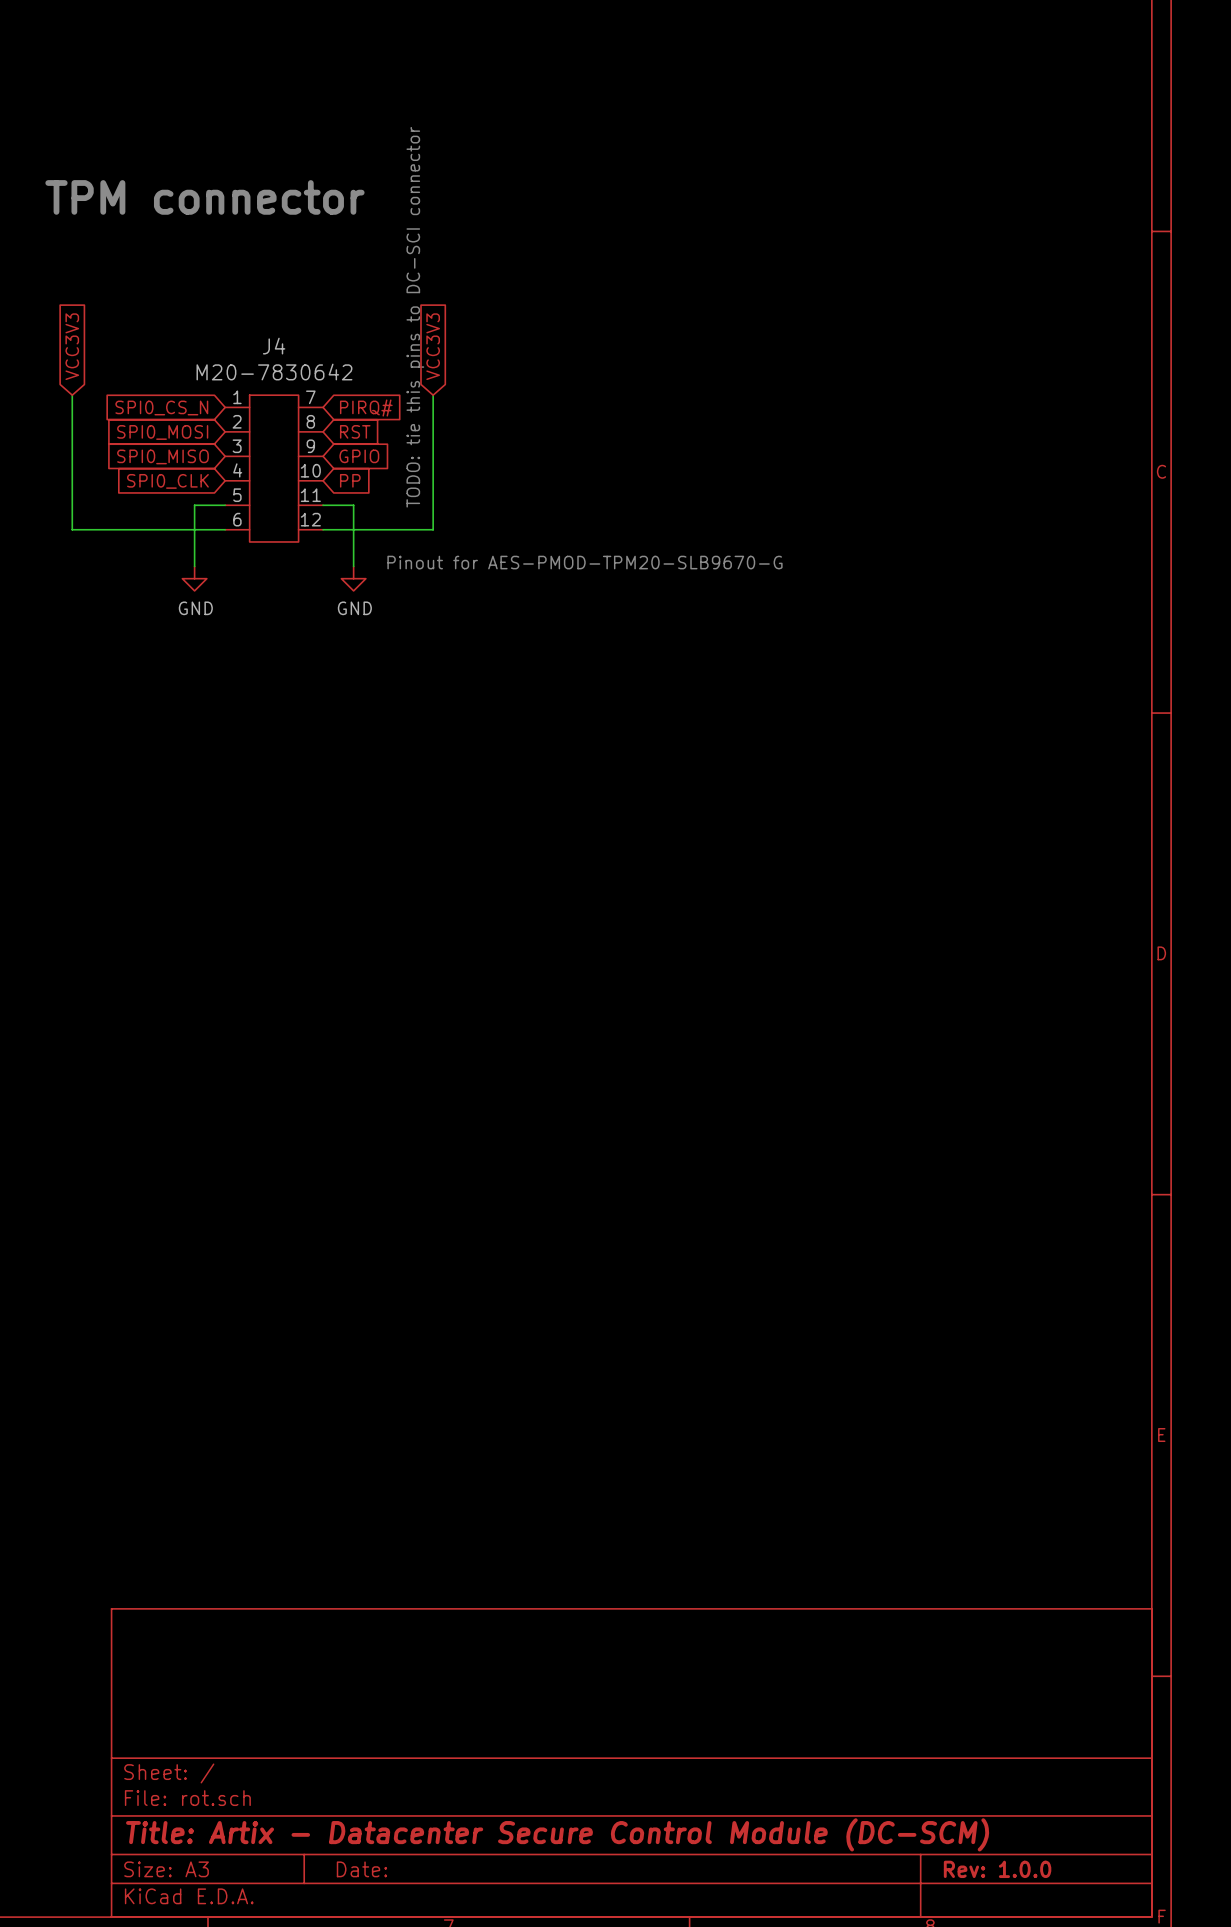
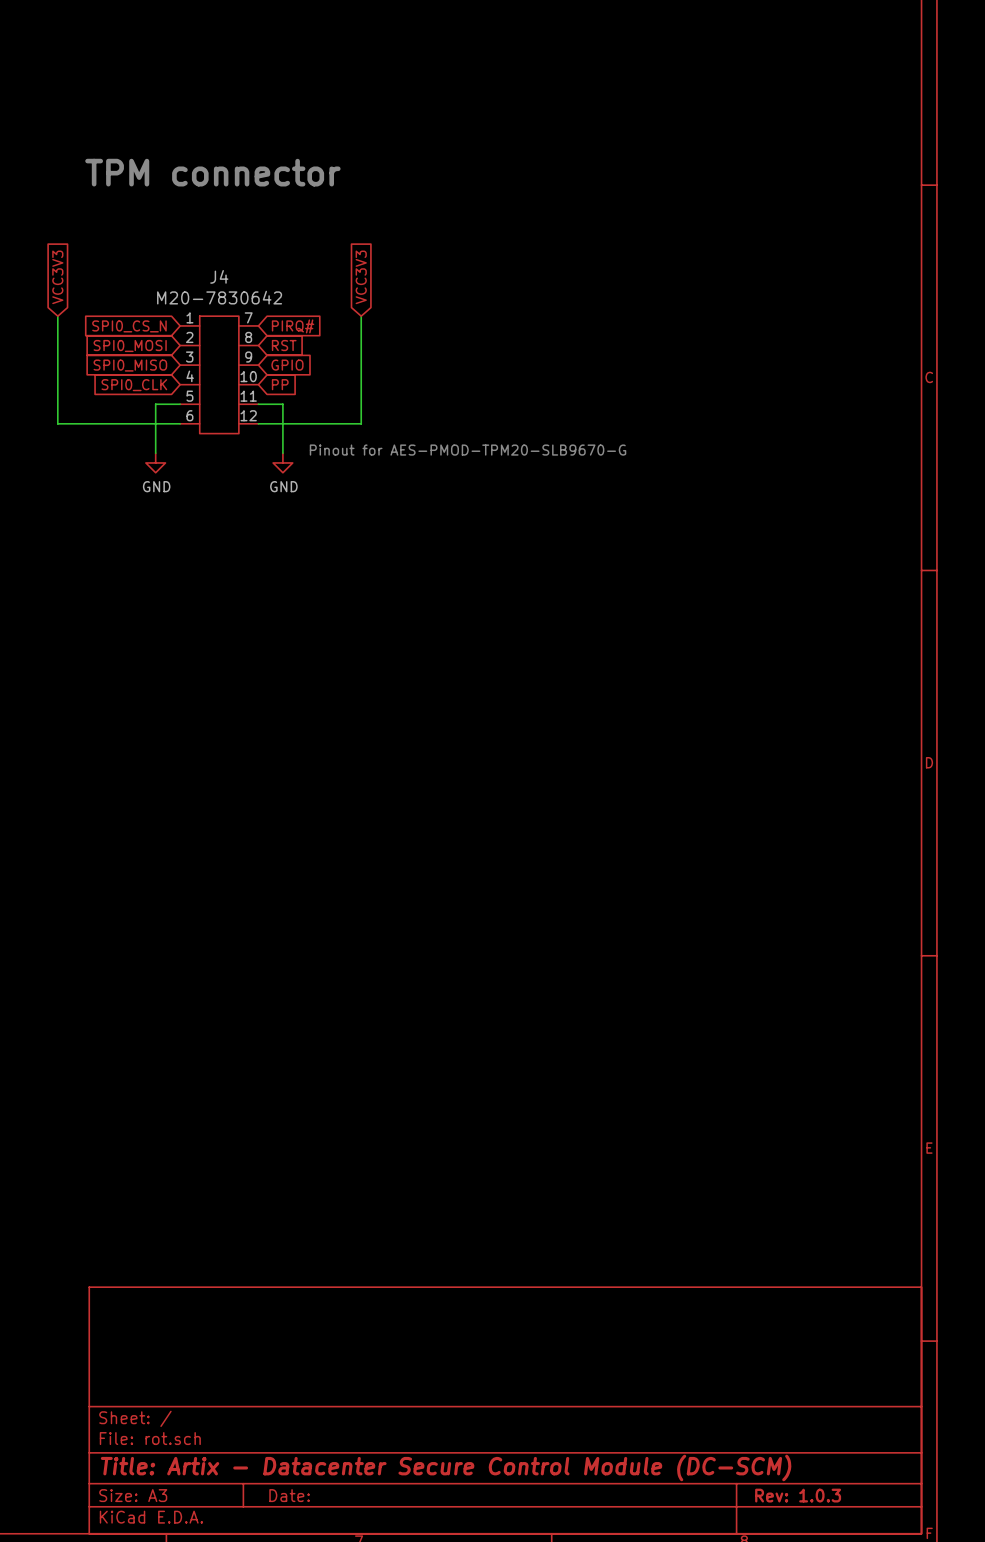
text position: TPM connector (204, 197) -> TPM connector (212, 172)
text: TODO: tie this pins to DC-SCI connector (415, 317) -> none
global label position: VCC3V3 (433, 346) -> VCC3V3 (361, 277)
wire: (433, 395) (433, 529) -> (361, 316) (361, 423) (346, 423)
title block: Rev: 1.0.0 (997, 1869) -> Rev: 1.0.3 (798, 1495)

